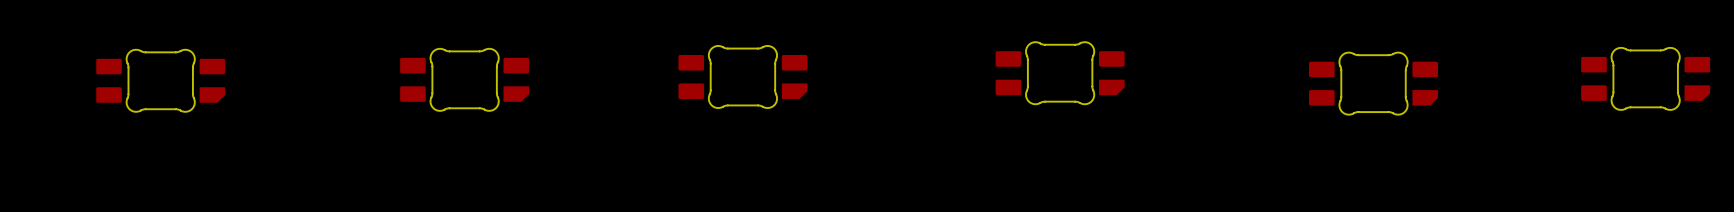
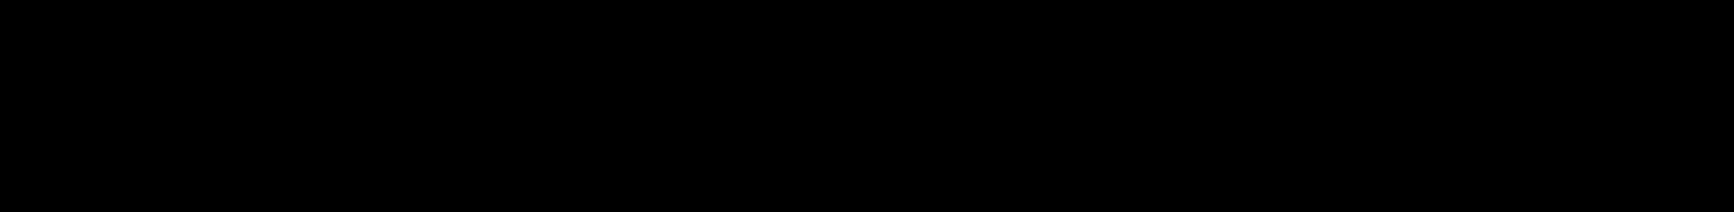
part: (1060, 73) -> none
part: (742, 76) -> none
part: (1645, 78) -> none
part: (464, 79) -> none
part: (160, 80) -> none
part: (1373, 83) -> none

